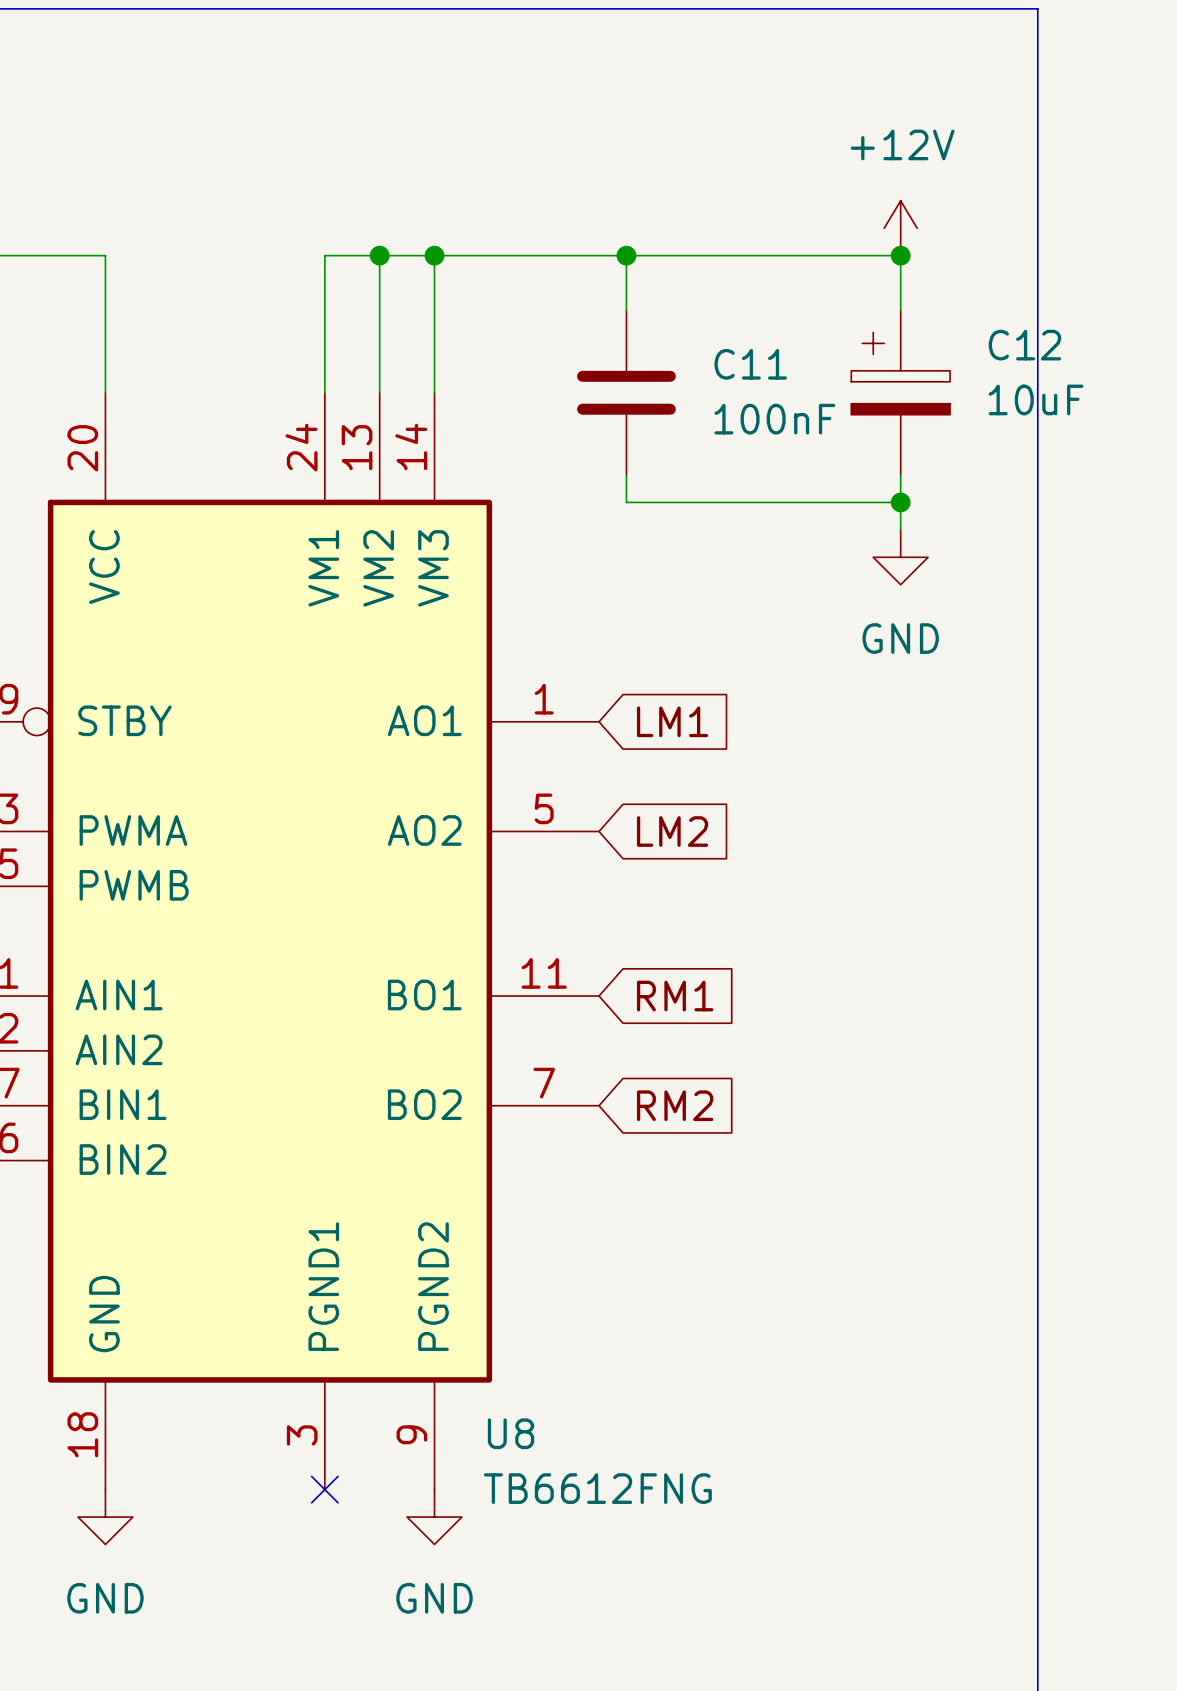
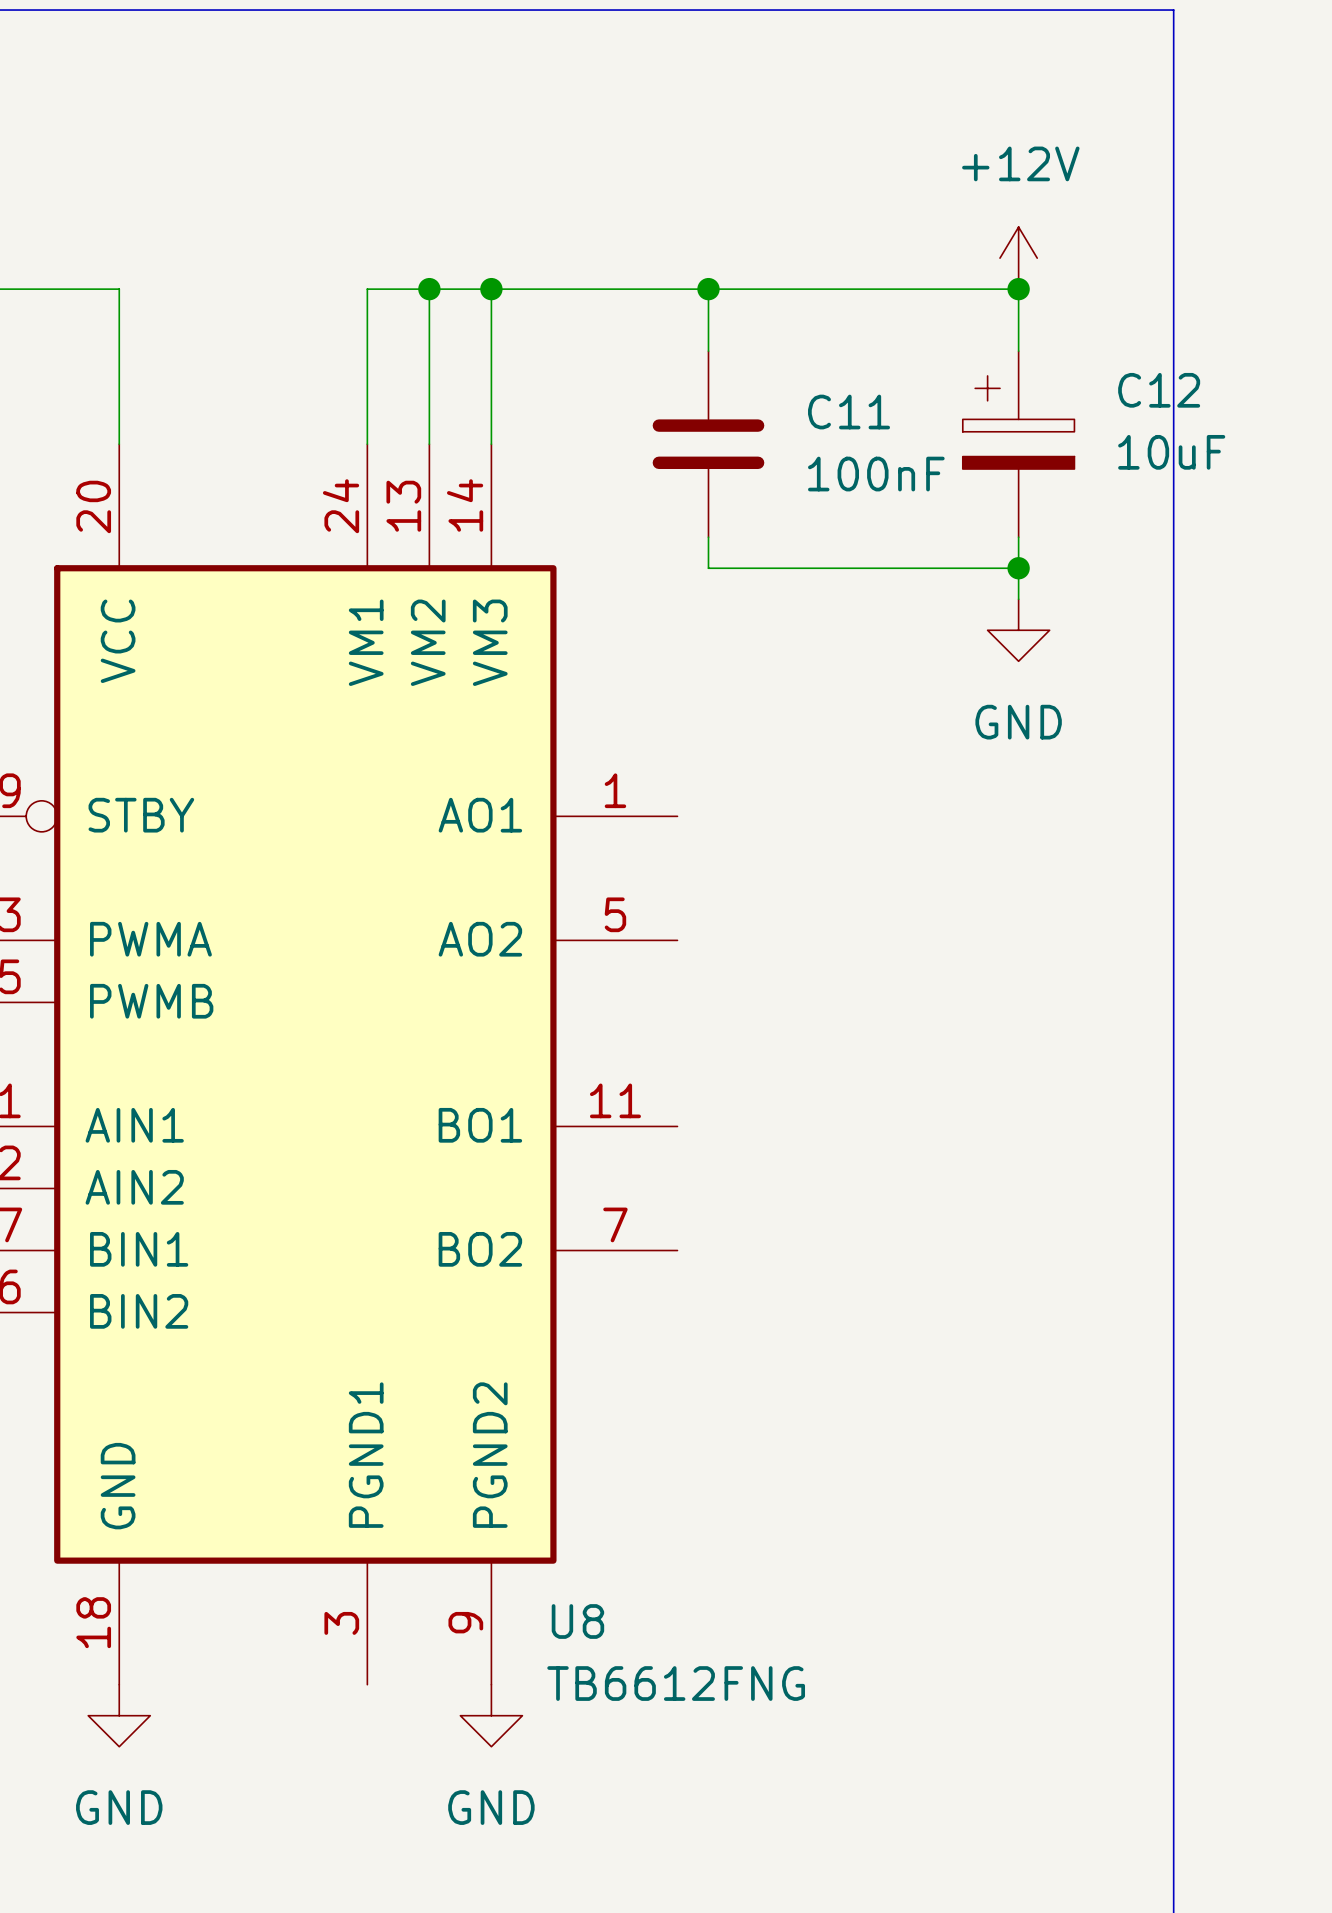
global label: LM1 (672, 721) -> none
global label: LM2 (672, 831) -> none
global label: RM1 (675, 996) -> none
global label: RM2 (675, 1105) -> none
no-connect mark: (324, 1489) -> none

